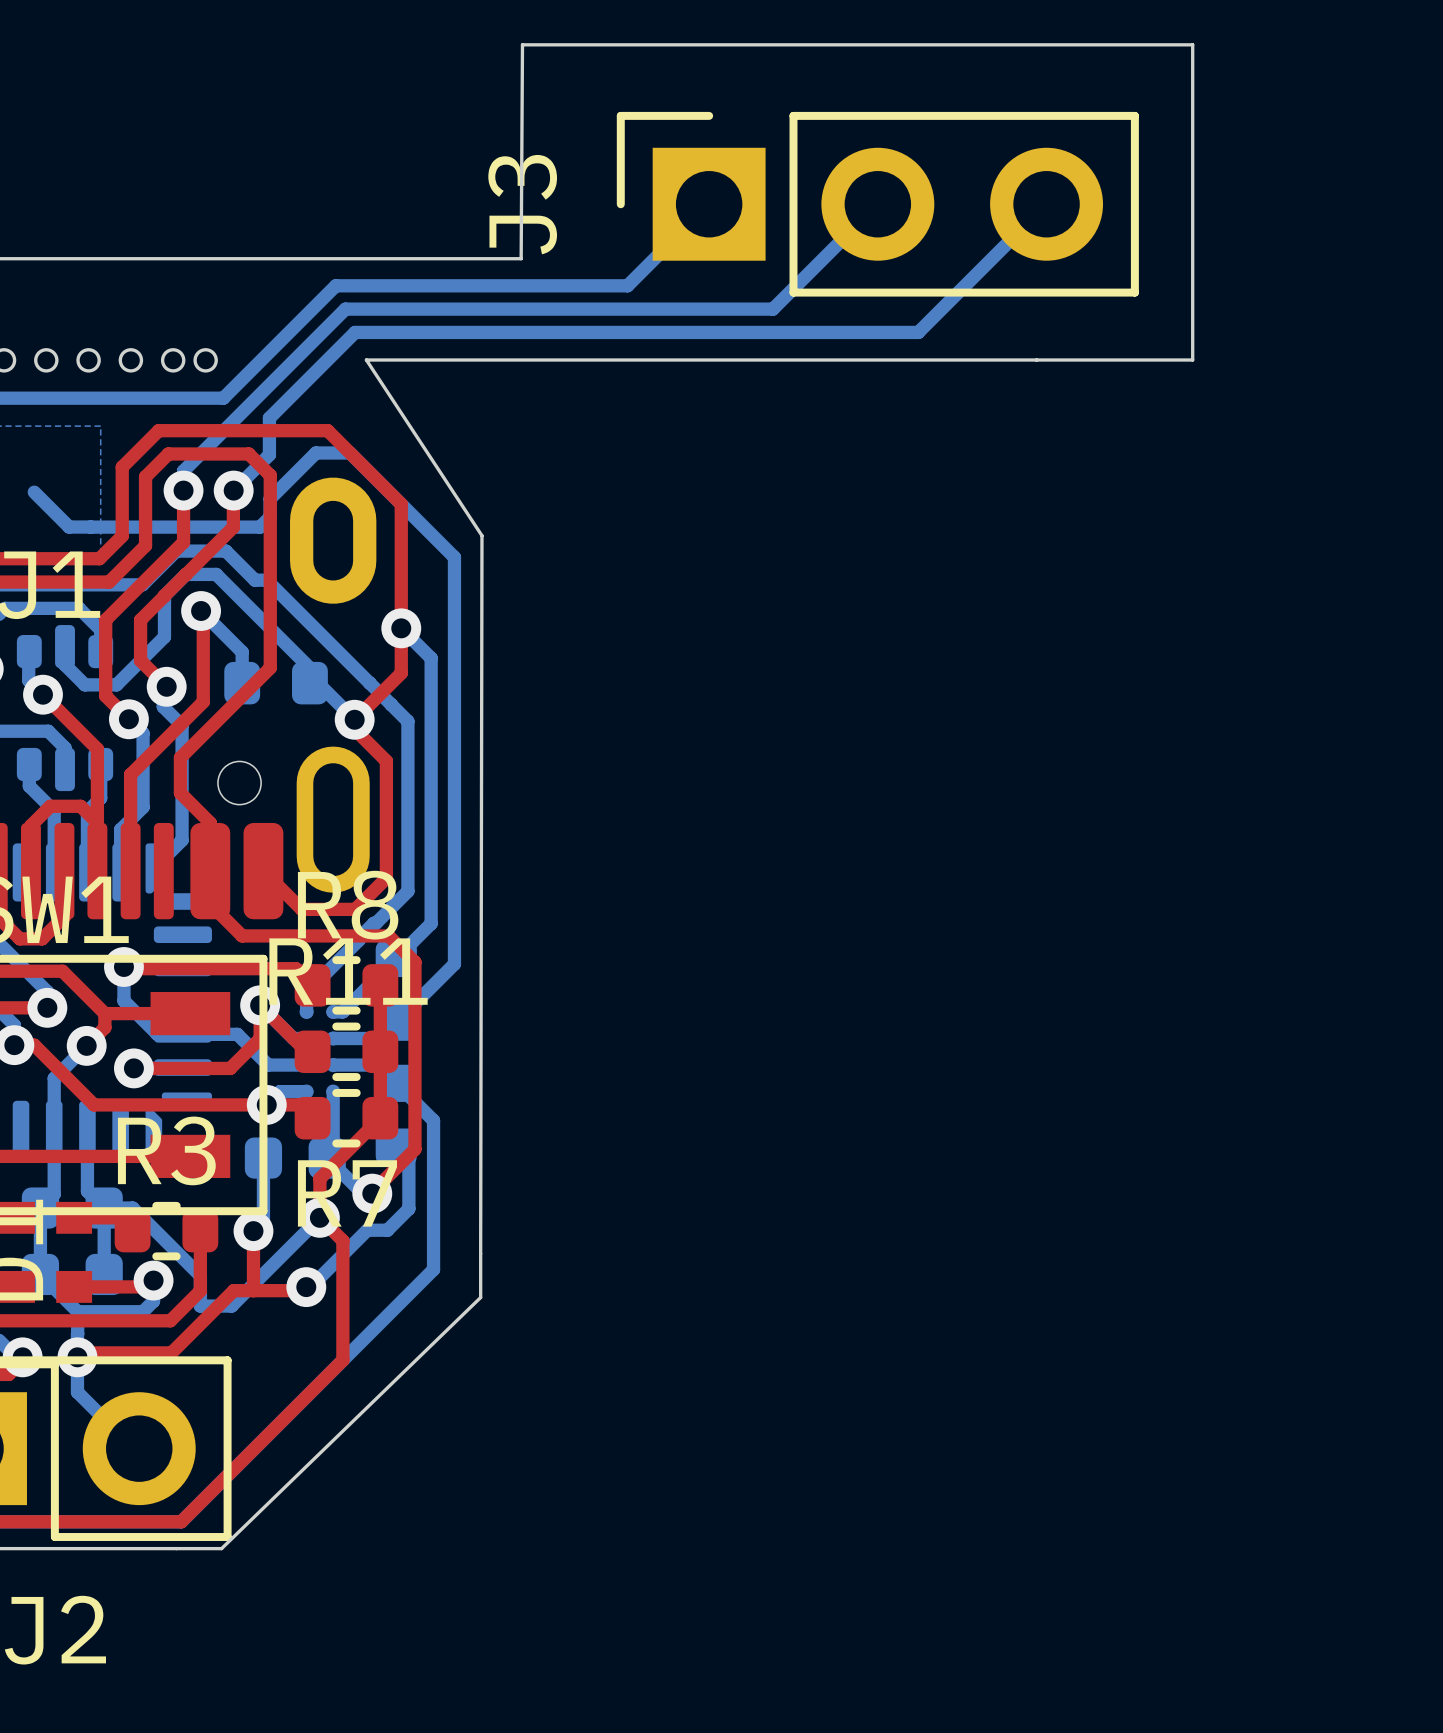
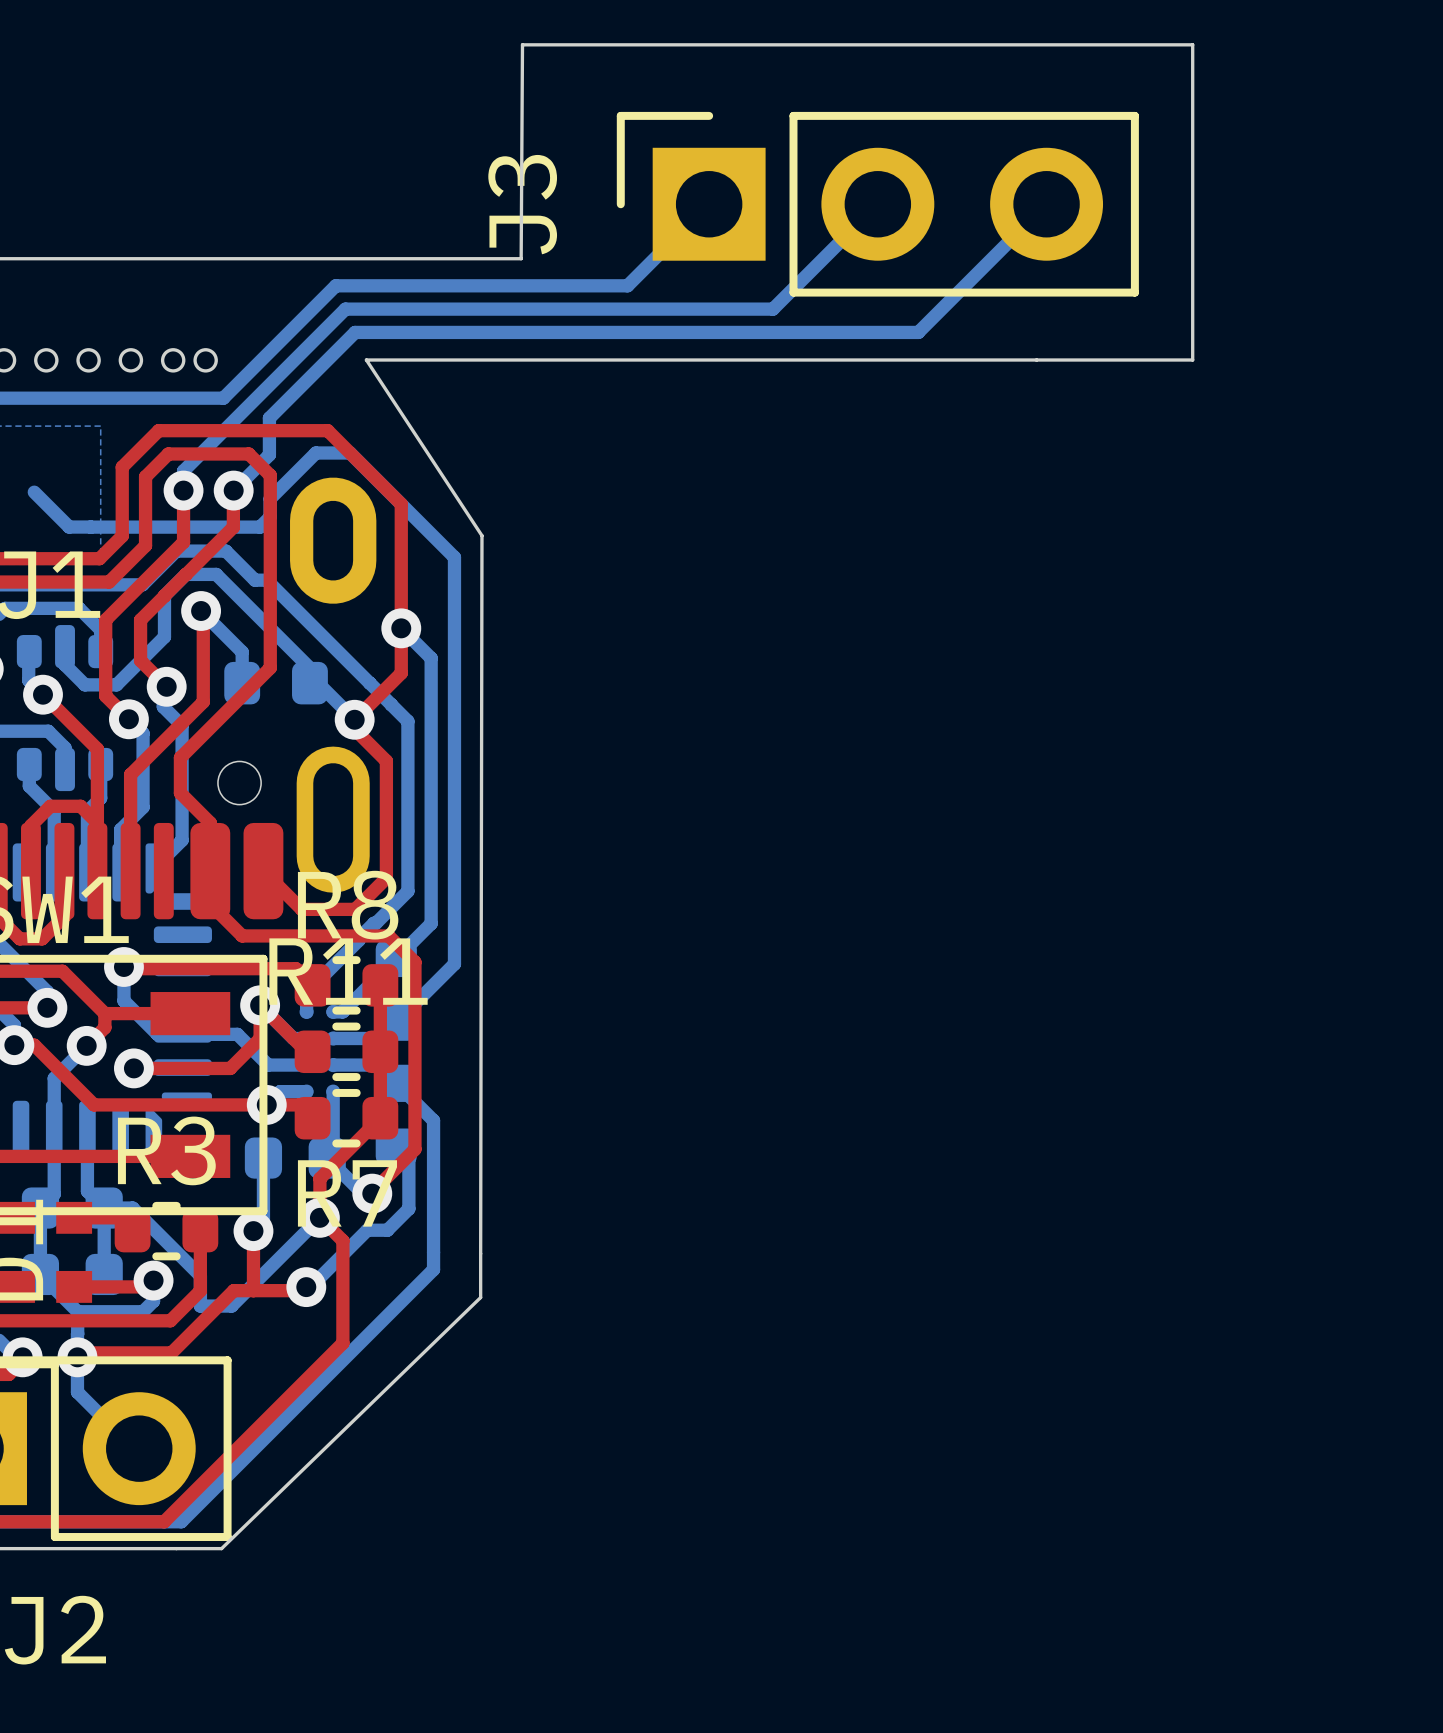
top track: (342, 1343) (342, 1360) (181, 1521) (164, 1521) -> (342, 1343) (164, 1521)

